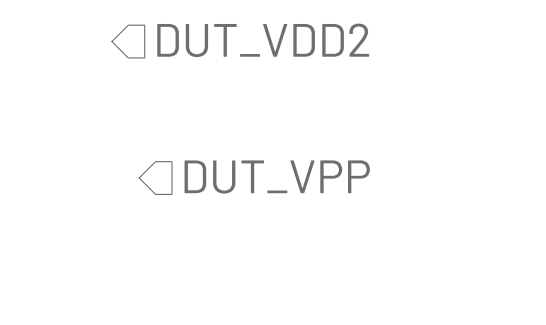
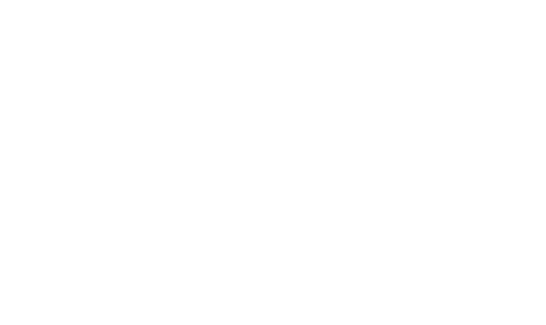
hierarchical label: DUT_VDD2 (263, 40) -> none
hierarchical label: DUT_VPP (277, 176) -> none

